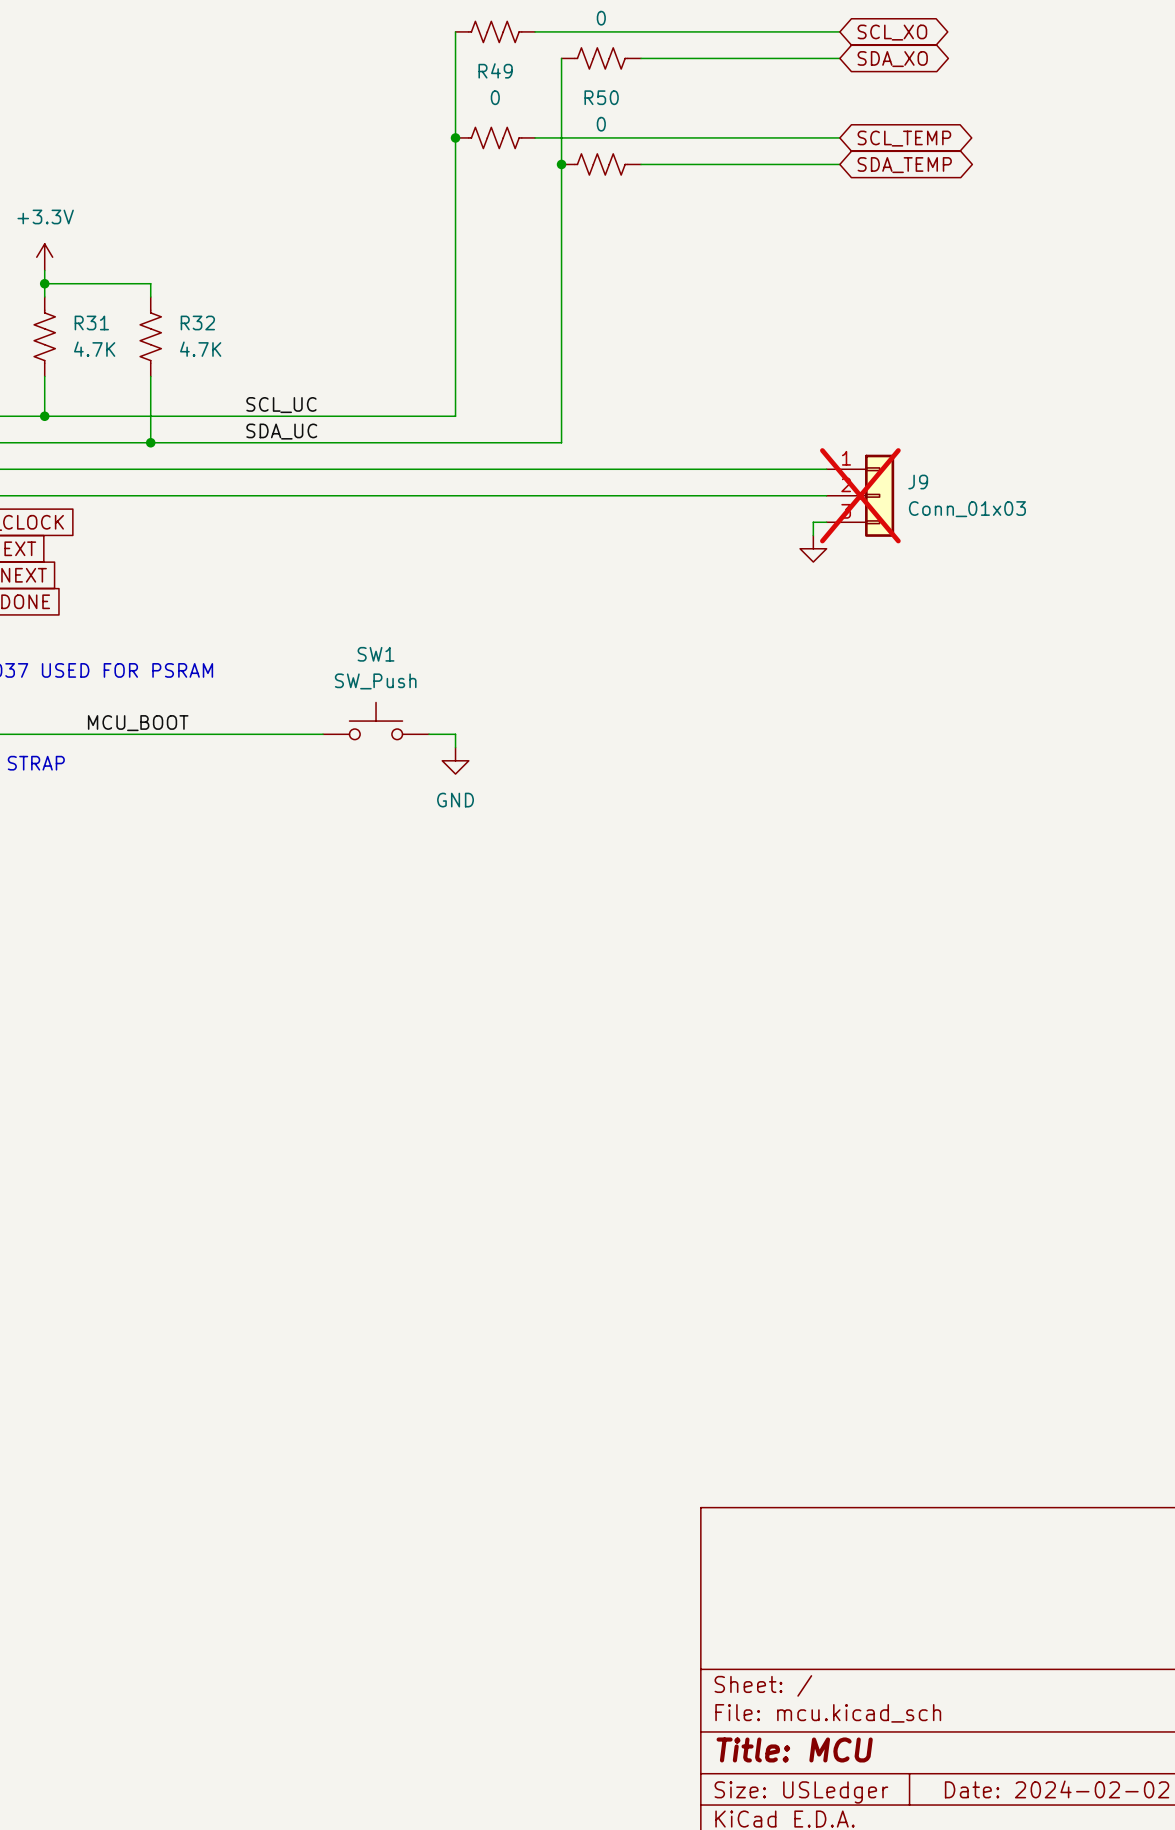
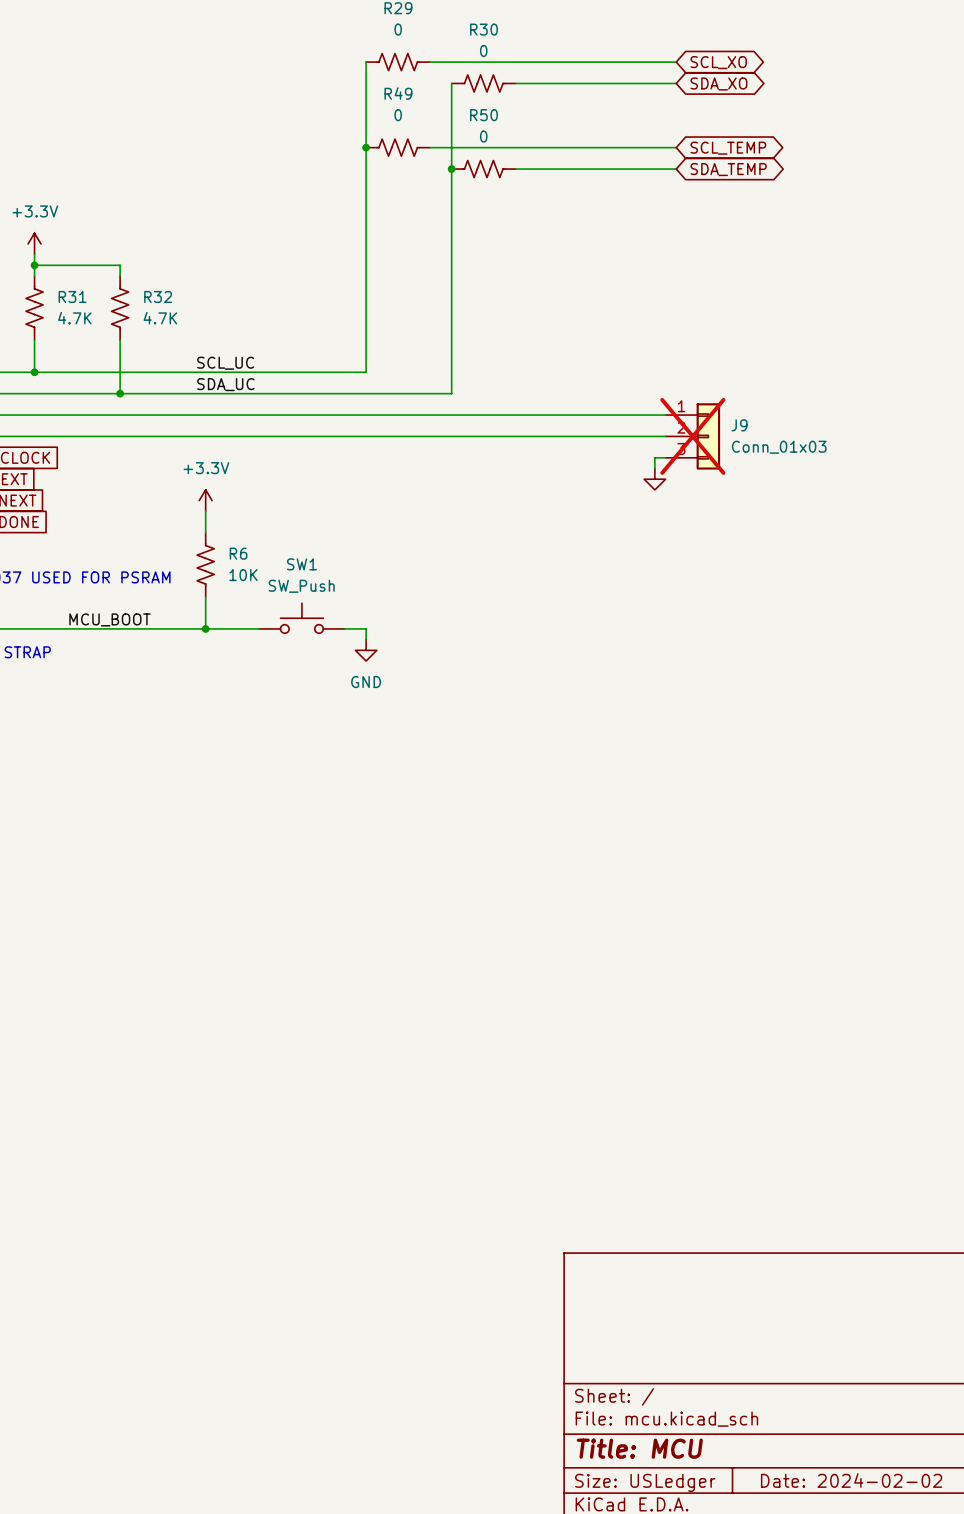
power symbol: none -> +3.3V (205, 500)
wire: none -> (205, 511) (205, 532)
R6: none -> 10K (205, 564)
wire: none -> (205, 596) (205, 628)
junction: none -> (205, 628)

